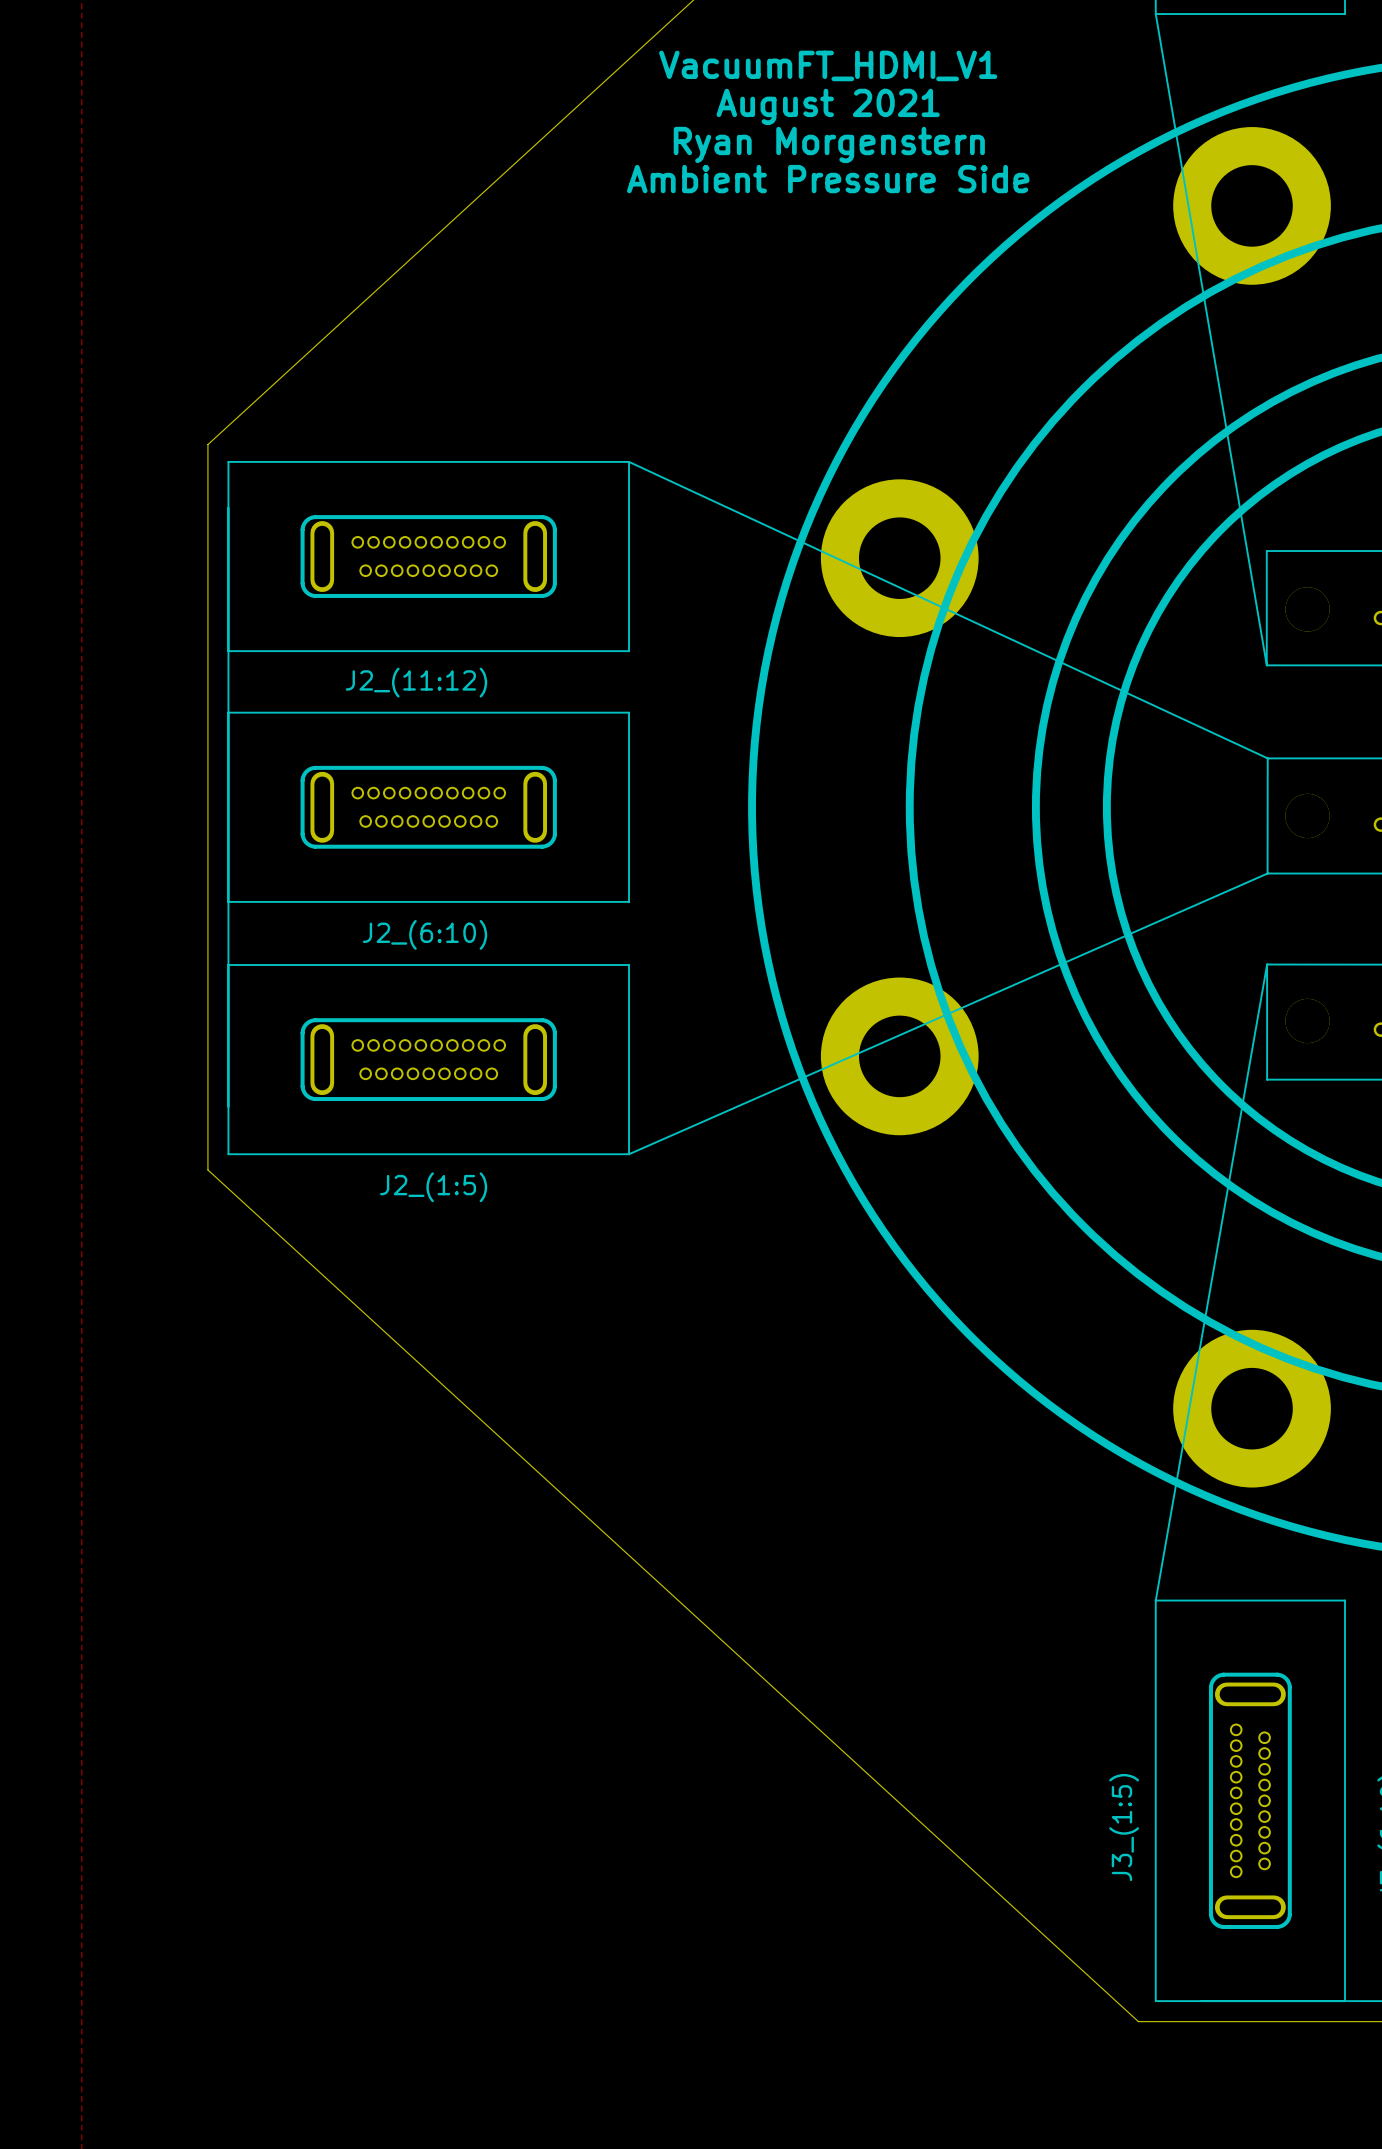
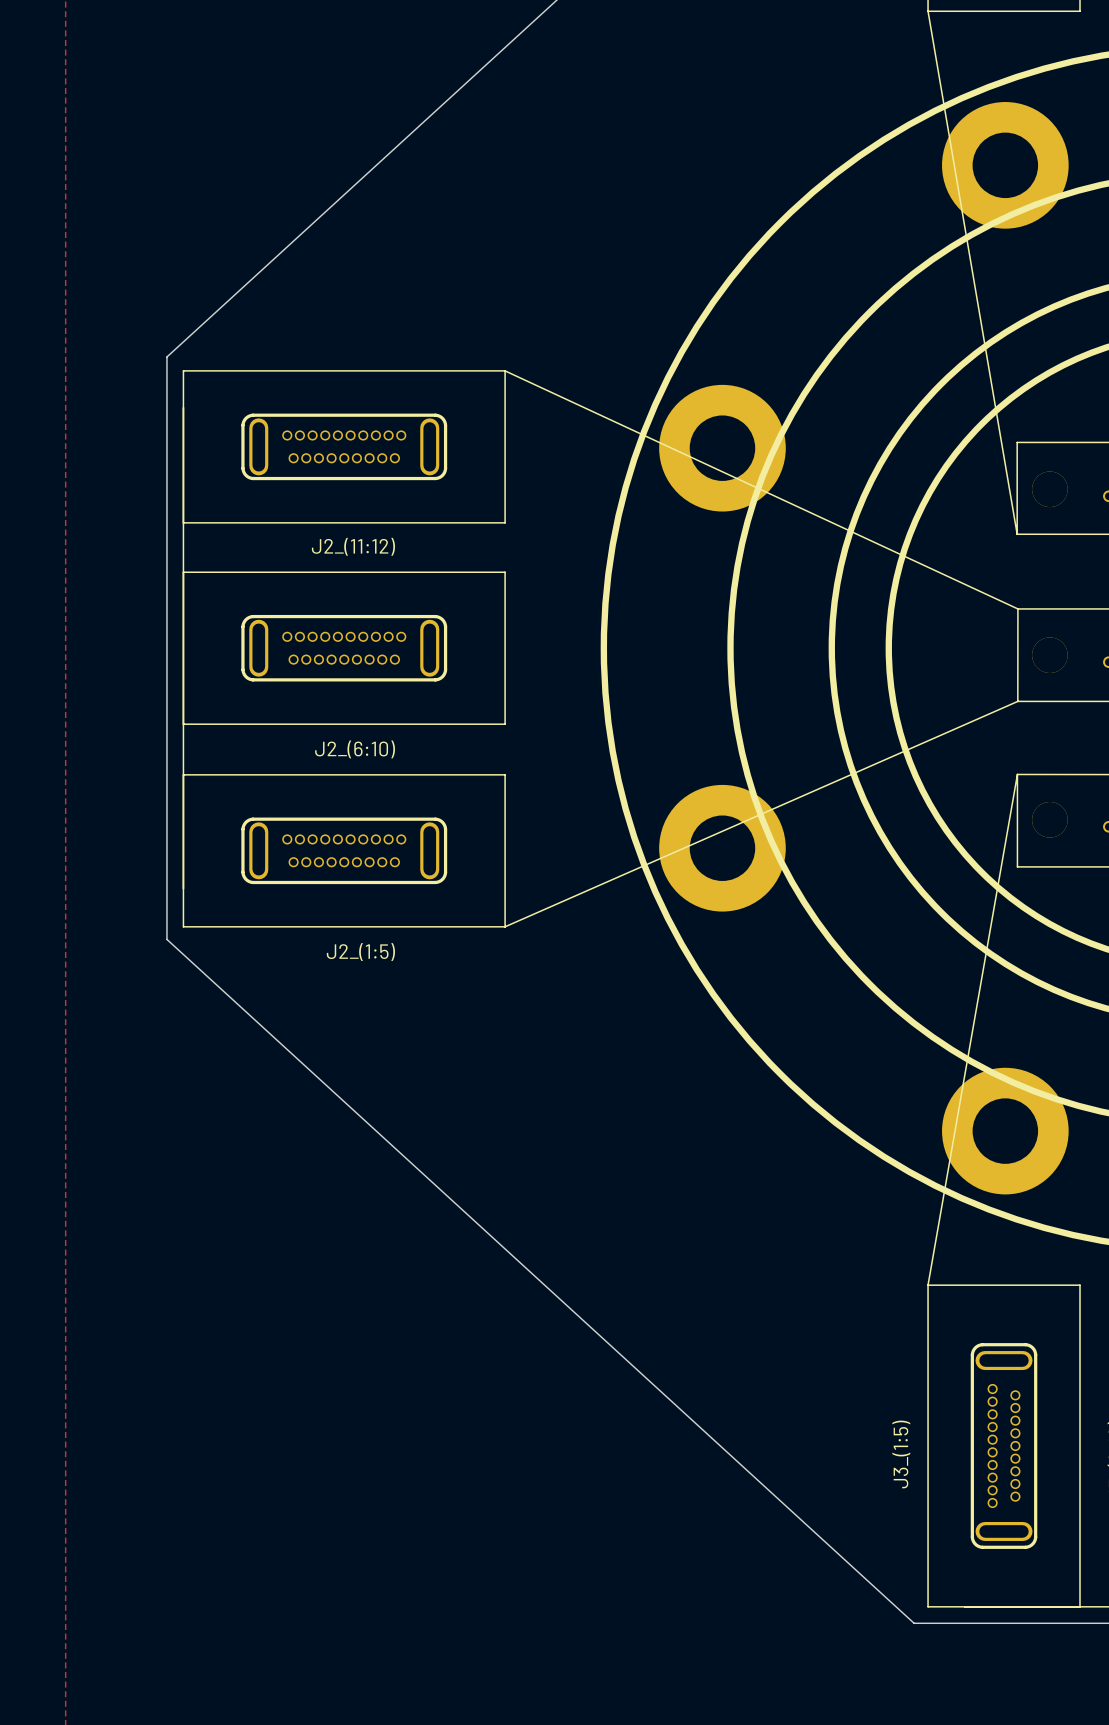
text: VacuumFT_HDMI_V1 (828, 65) -> none
text: August 2021 (828, 106) -> none
text: Ryan Morgenstern (829, 144) -> none
text: Ambient Pressure Side (828, 179) -> none

